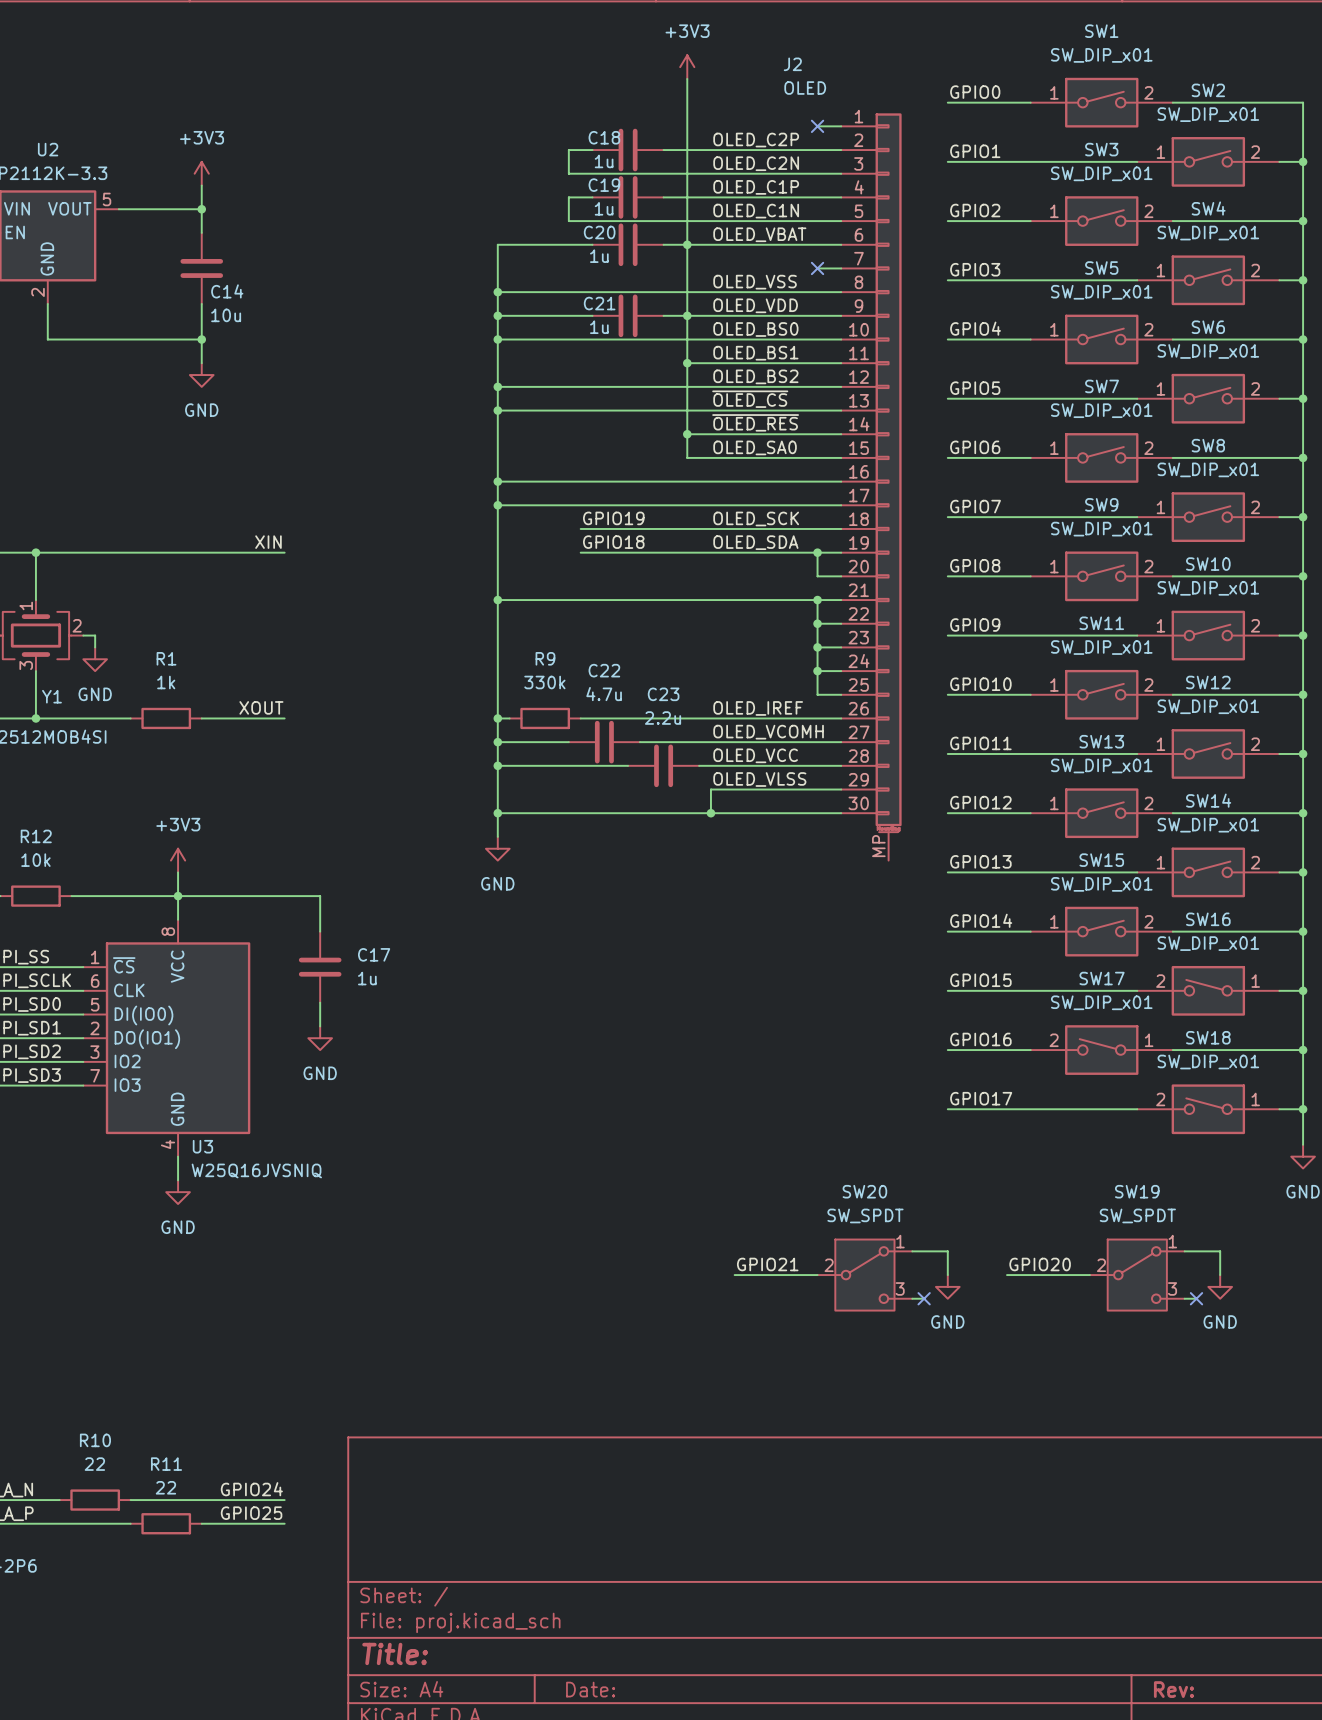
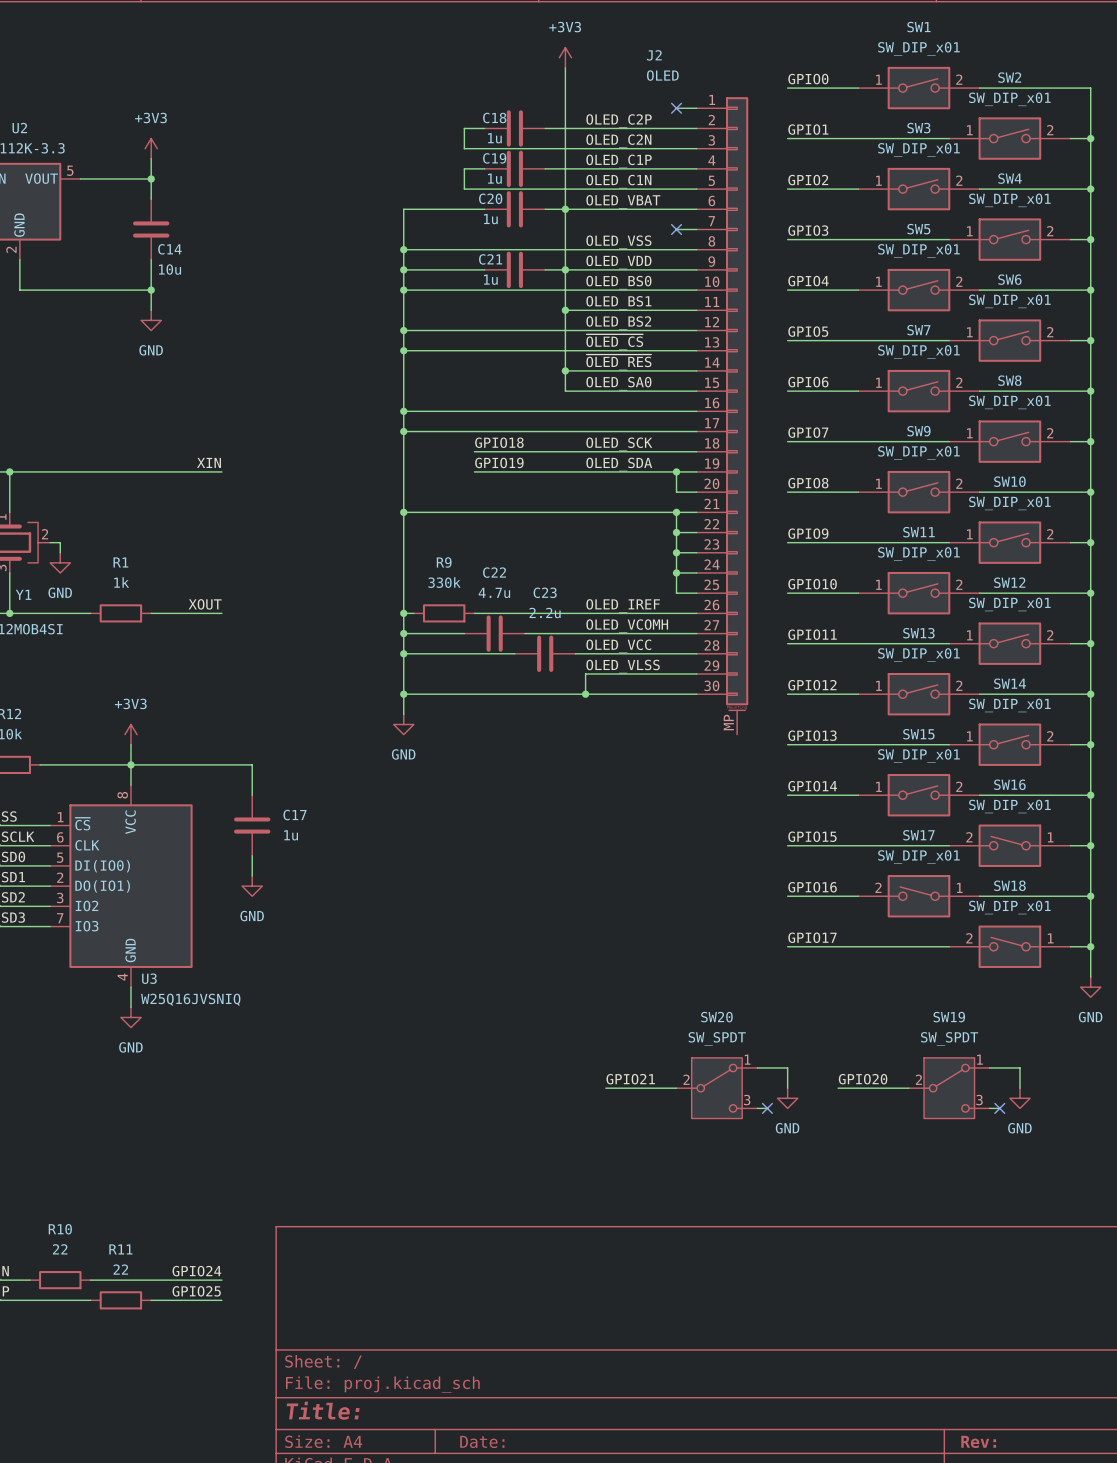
label: GPIO19 (613, 518) -> GPIO18 (499, 442)
label: GPIO18 (613, 542) -> GPIO19 (499, 462)

